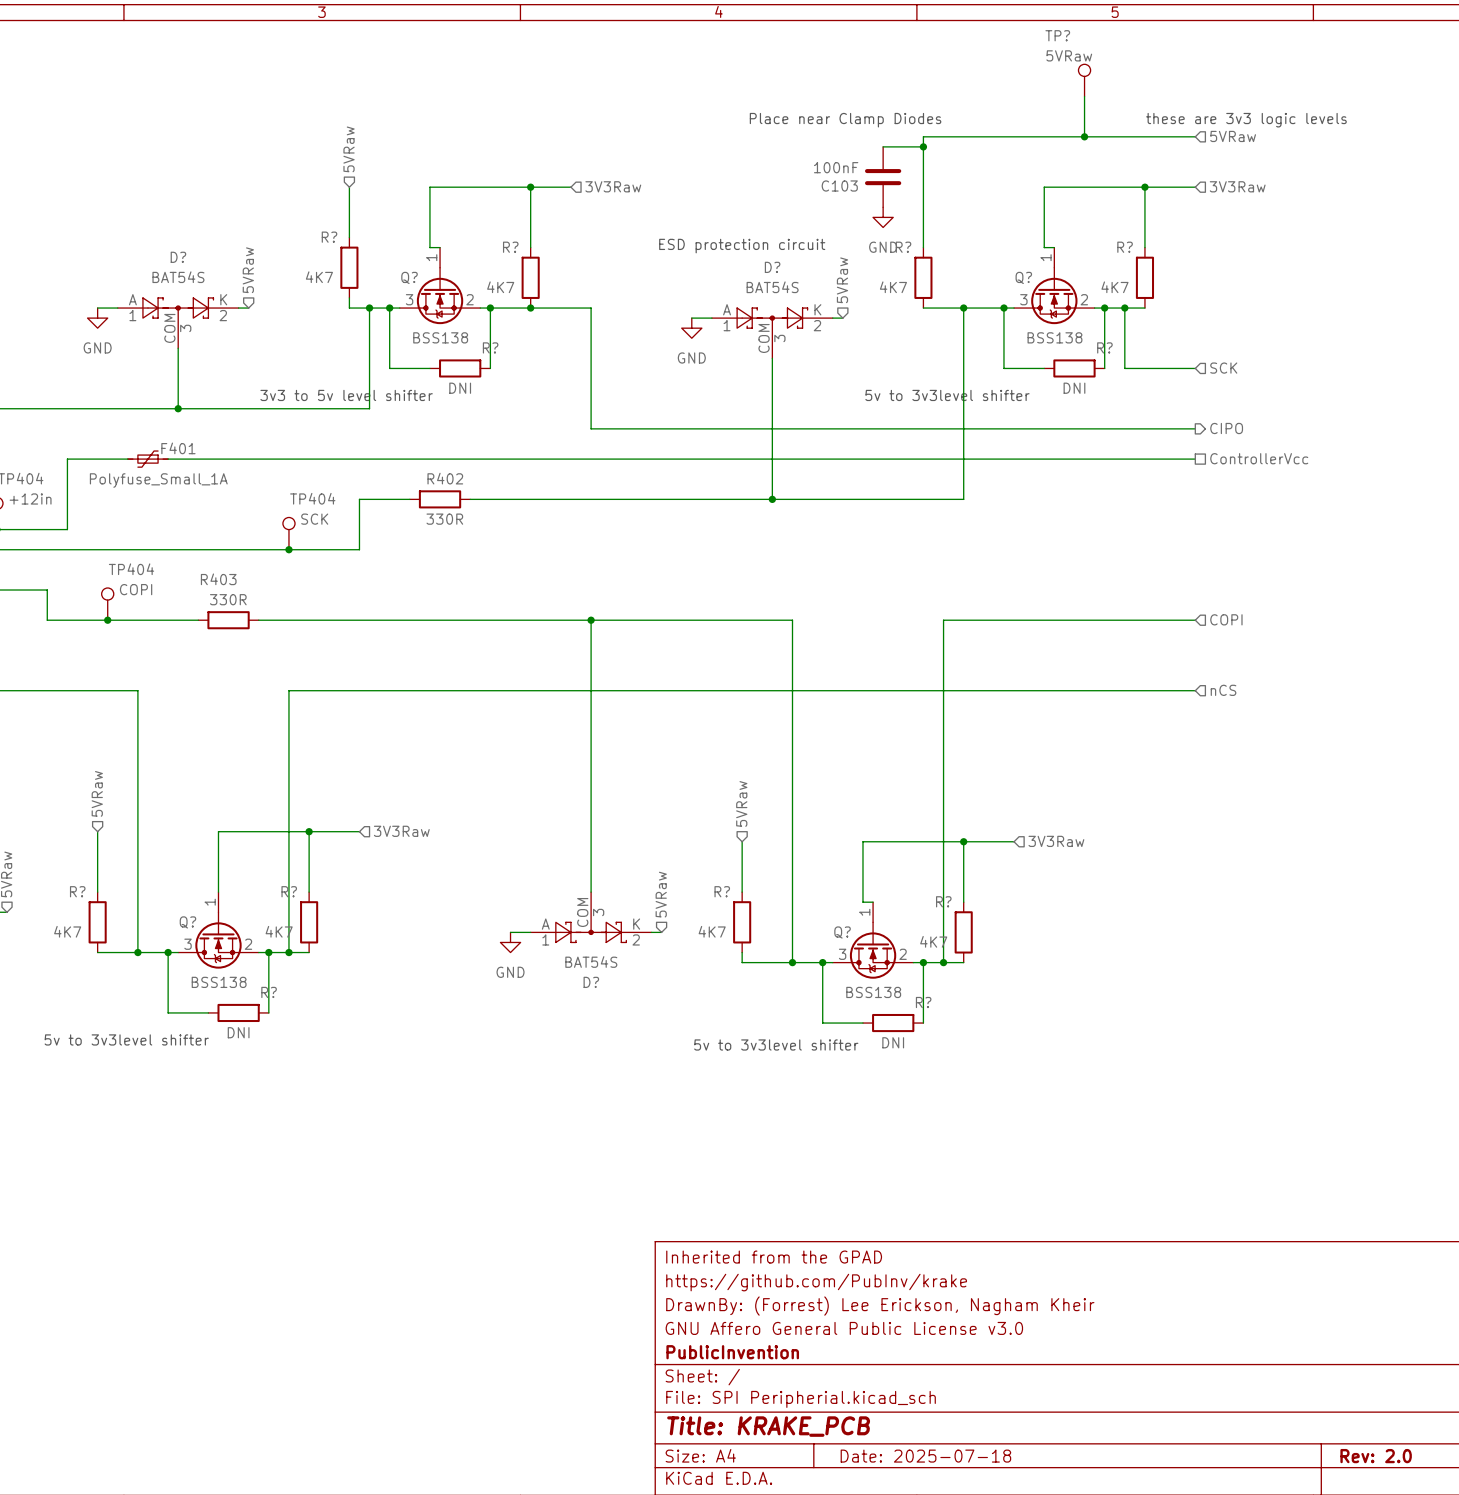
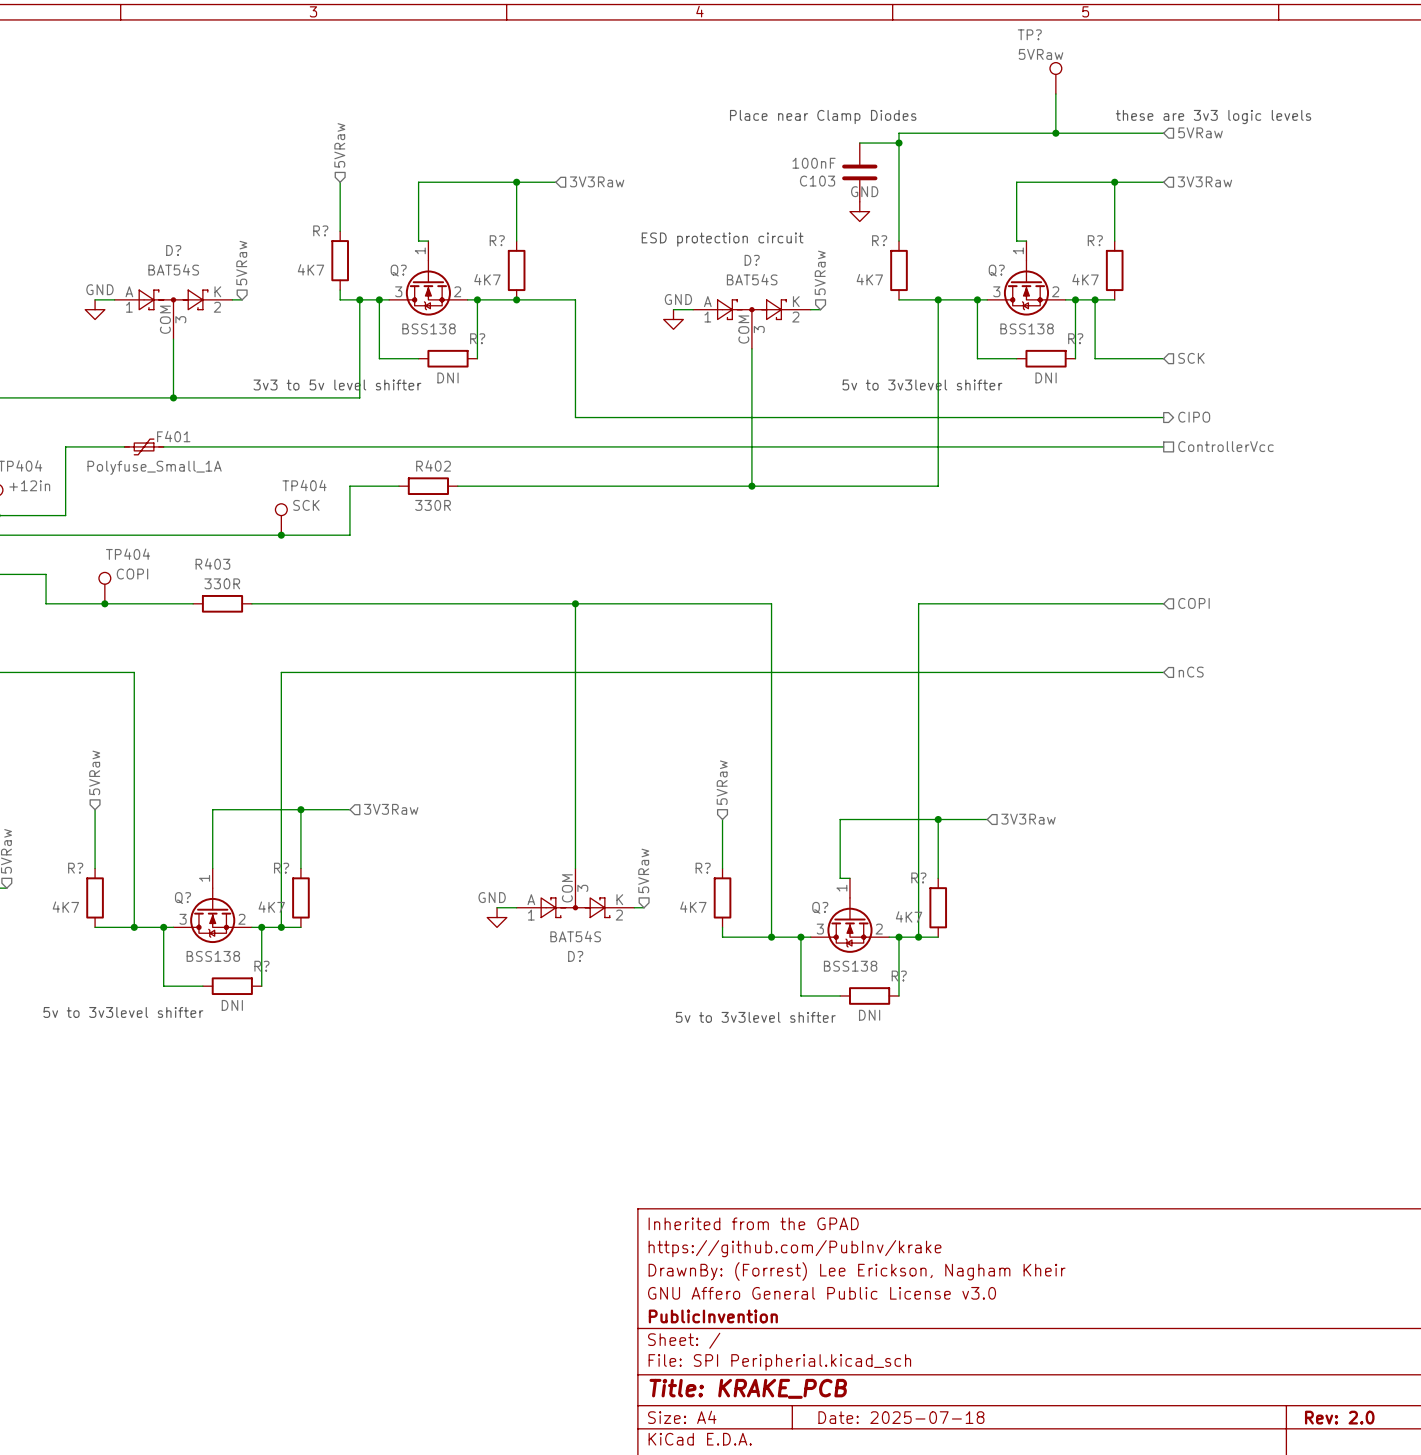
power symbol text position: GND (883, 247) -> GND (864, 191)
power symbol text position: GND (97, 347) -> GND (99, 289)
power symbol text position: GND (691, 358) -> GND (678, 299)
power symbol text position: GND (510, 972) -> GND (492, 897)

